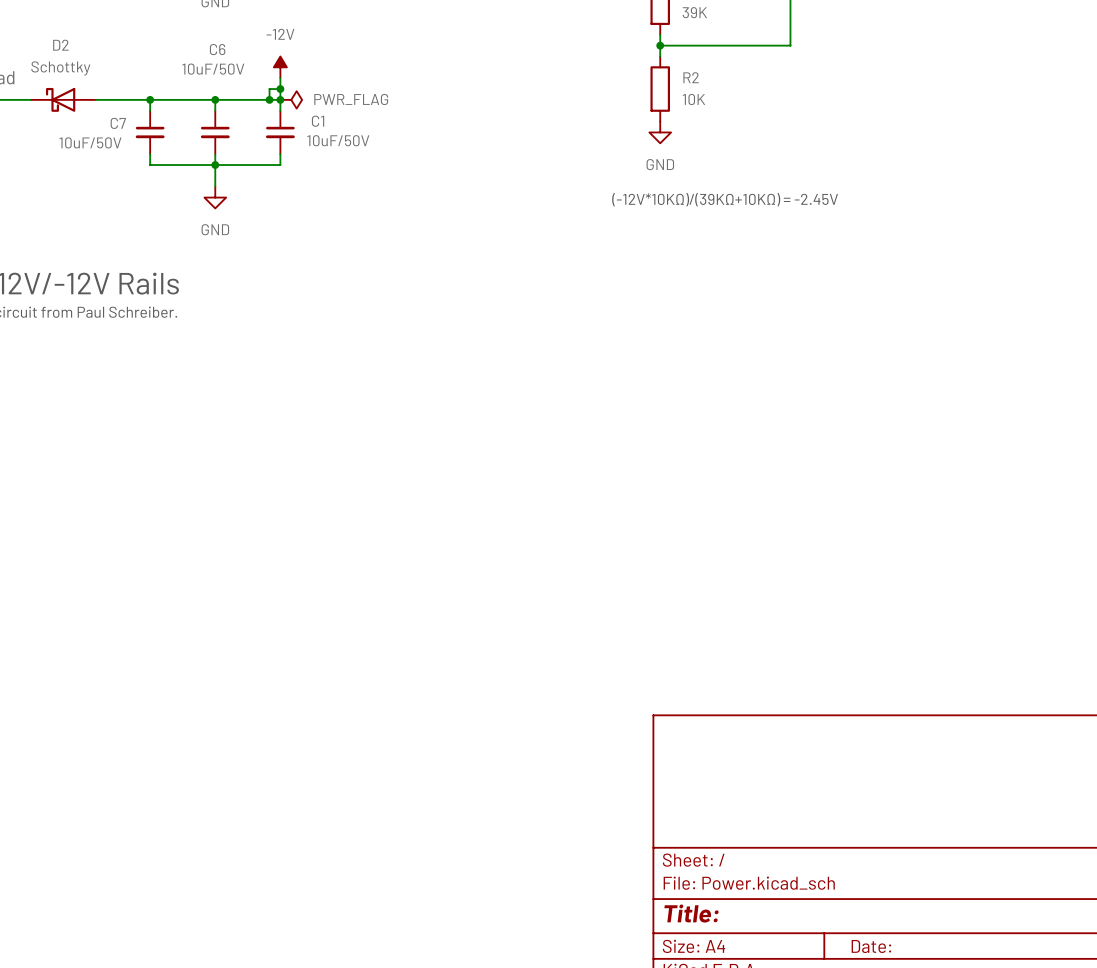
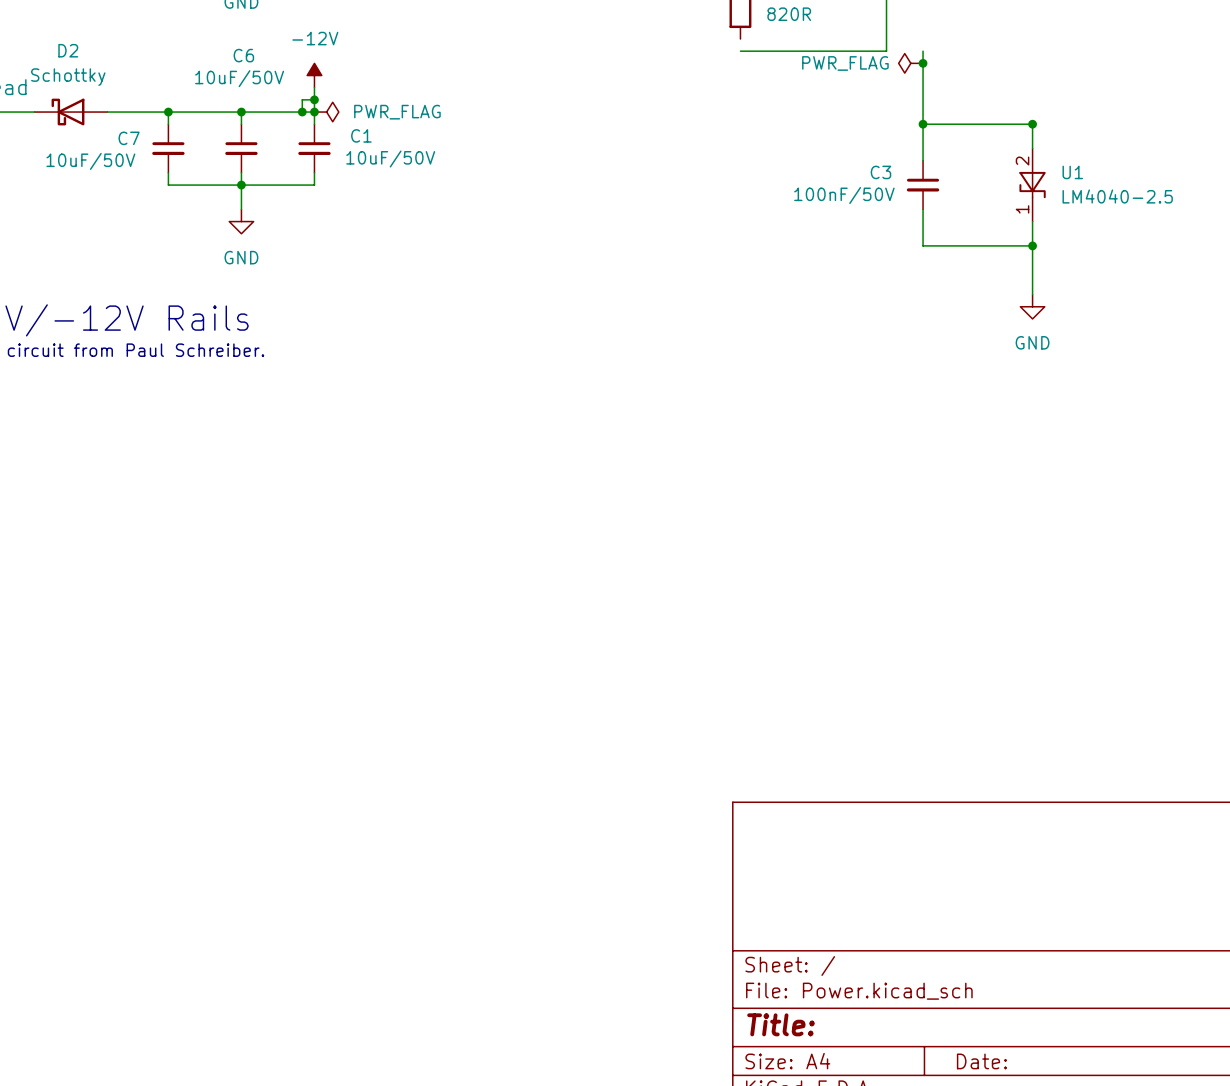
part value: 39K (694, 12) -> none
part text: none -> 820R (789, 14)
wire: (660, 34) (660, 56) -> none
junction: (660, 45) -> none
wire: none -> (923, 51) (923, 160)
power symbol: none -> PWR_FLAG (910, 63)
junction: none -> (923, 63)
R2: 10K (660, 89) -> none
wire: none -> (923, 124) (1032, 124) (1032, 148)
junction: none -> (923, 124)
junction: none -> (1032, 124)
power symbol: GND (660, 132) -> none
C3: none -> (923, 185)
U1: none -> LM4040-2.5 (1032, 185)
wire: none -> (923, 209) (923, 245) (1032, 245)
wire: none -> (1032, 221) (1032, 294)
text: (-12V*10KΩ)/(39KΩ+10KΩ) = -2.45V (725, 199) -> none
junction: none -> (1032, 245)
power symbol: none -> GND (1032, 306)

